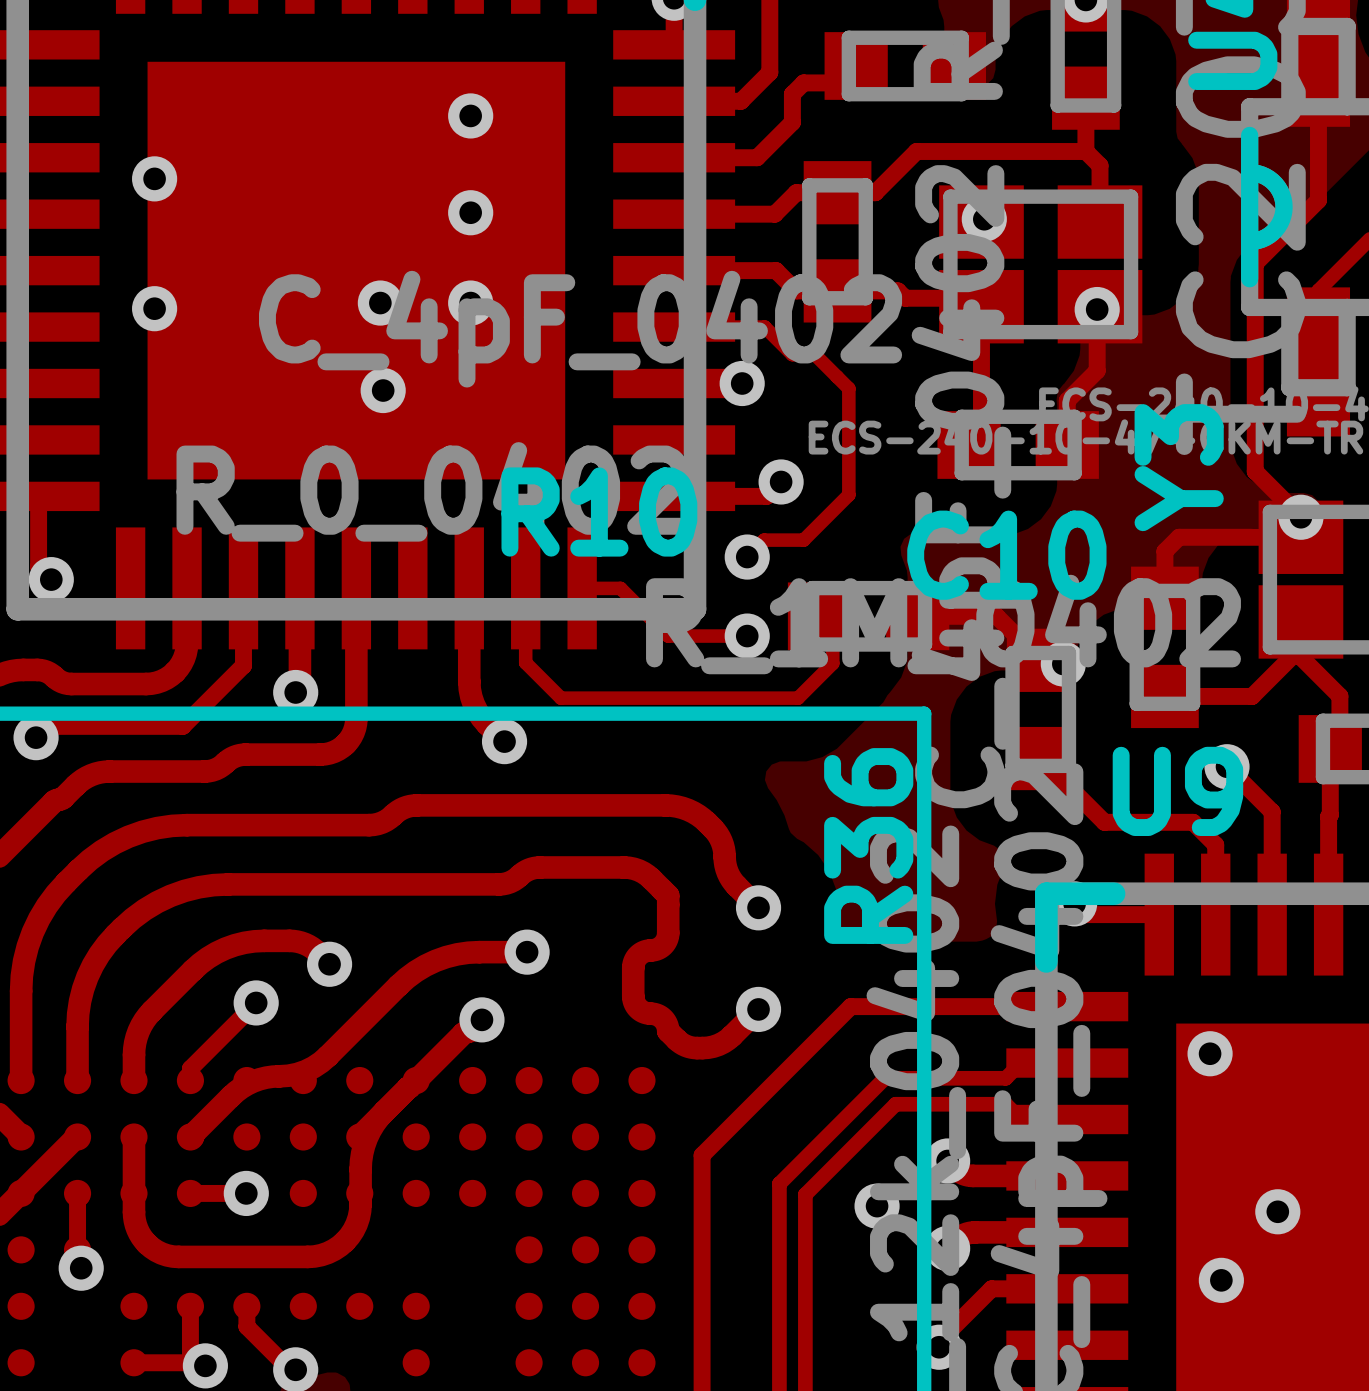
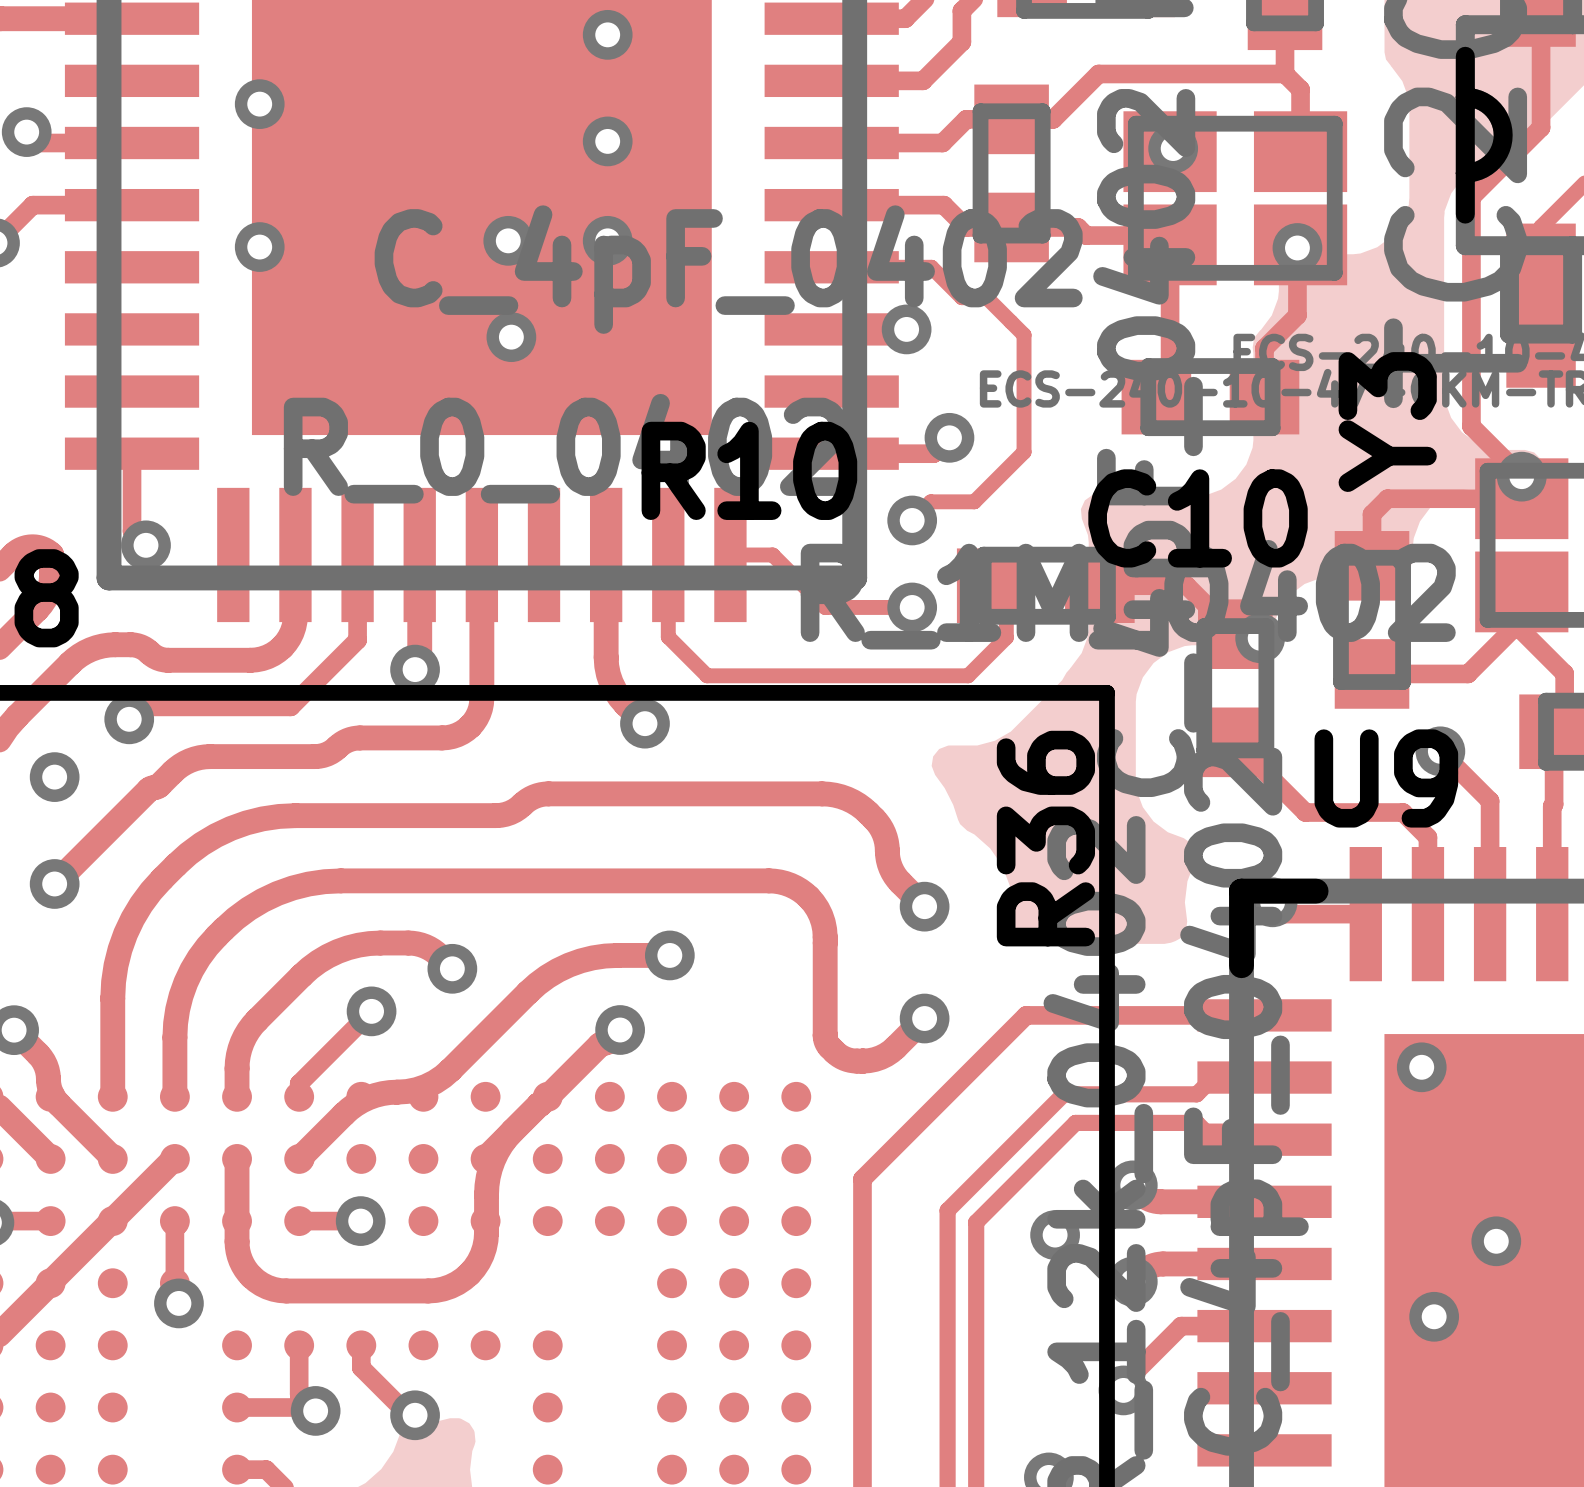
track: (499, 884) (510, 882) (526, 870) (537, 867) (629, 867) (647, 875) (668, 895) (668, 934) (661, 946) (643, 952) (634, 960) (633, 998) (635, 1005) (641, 1010) (656, 1014) (663, 1018) (668, 1031) (672, 1035) -> (638, 880) (774, 881) (790, 885) (804, 893) (817, 908) (824, 929) (825, 1035) (829, 1047)

